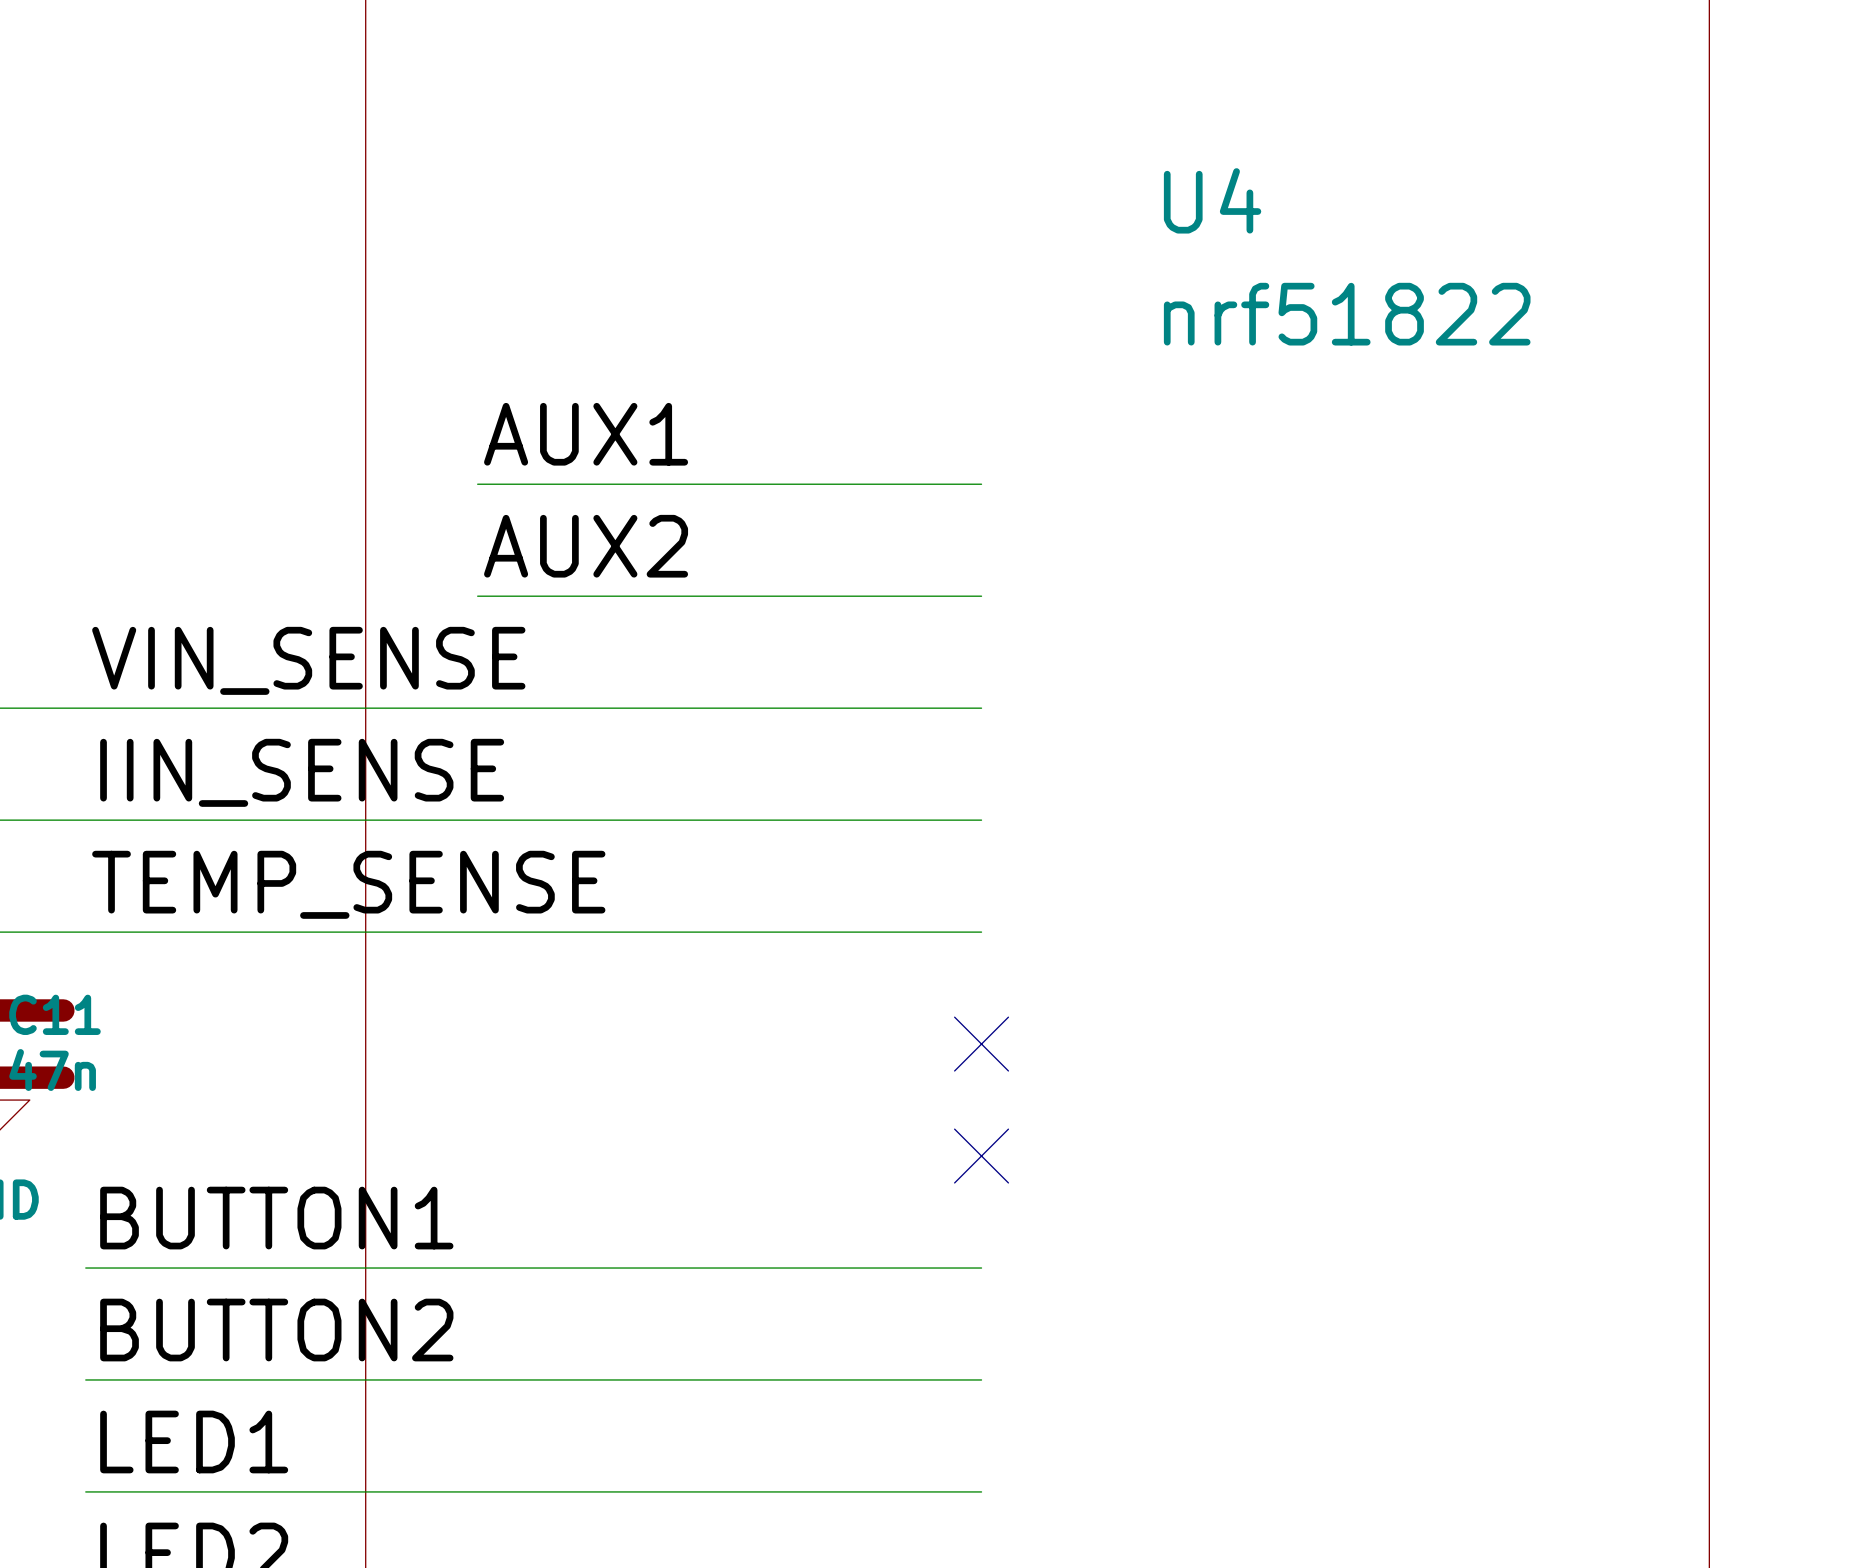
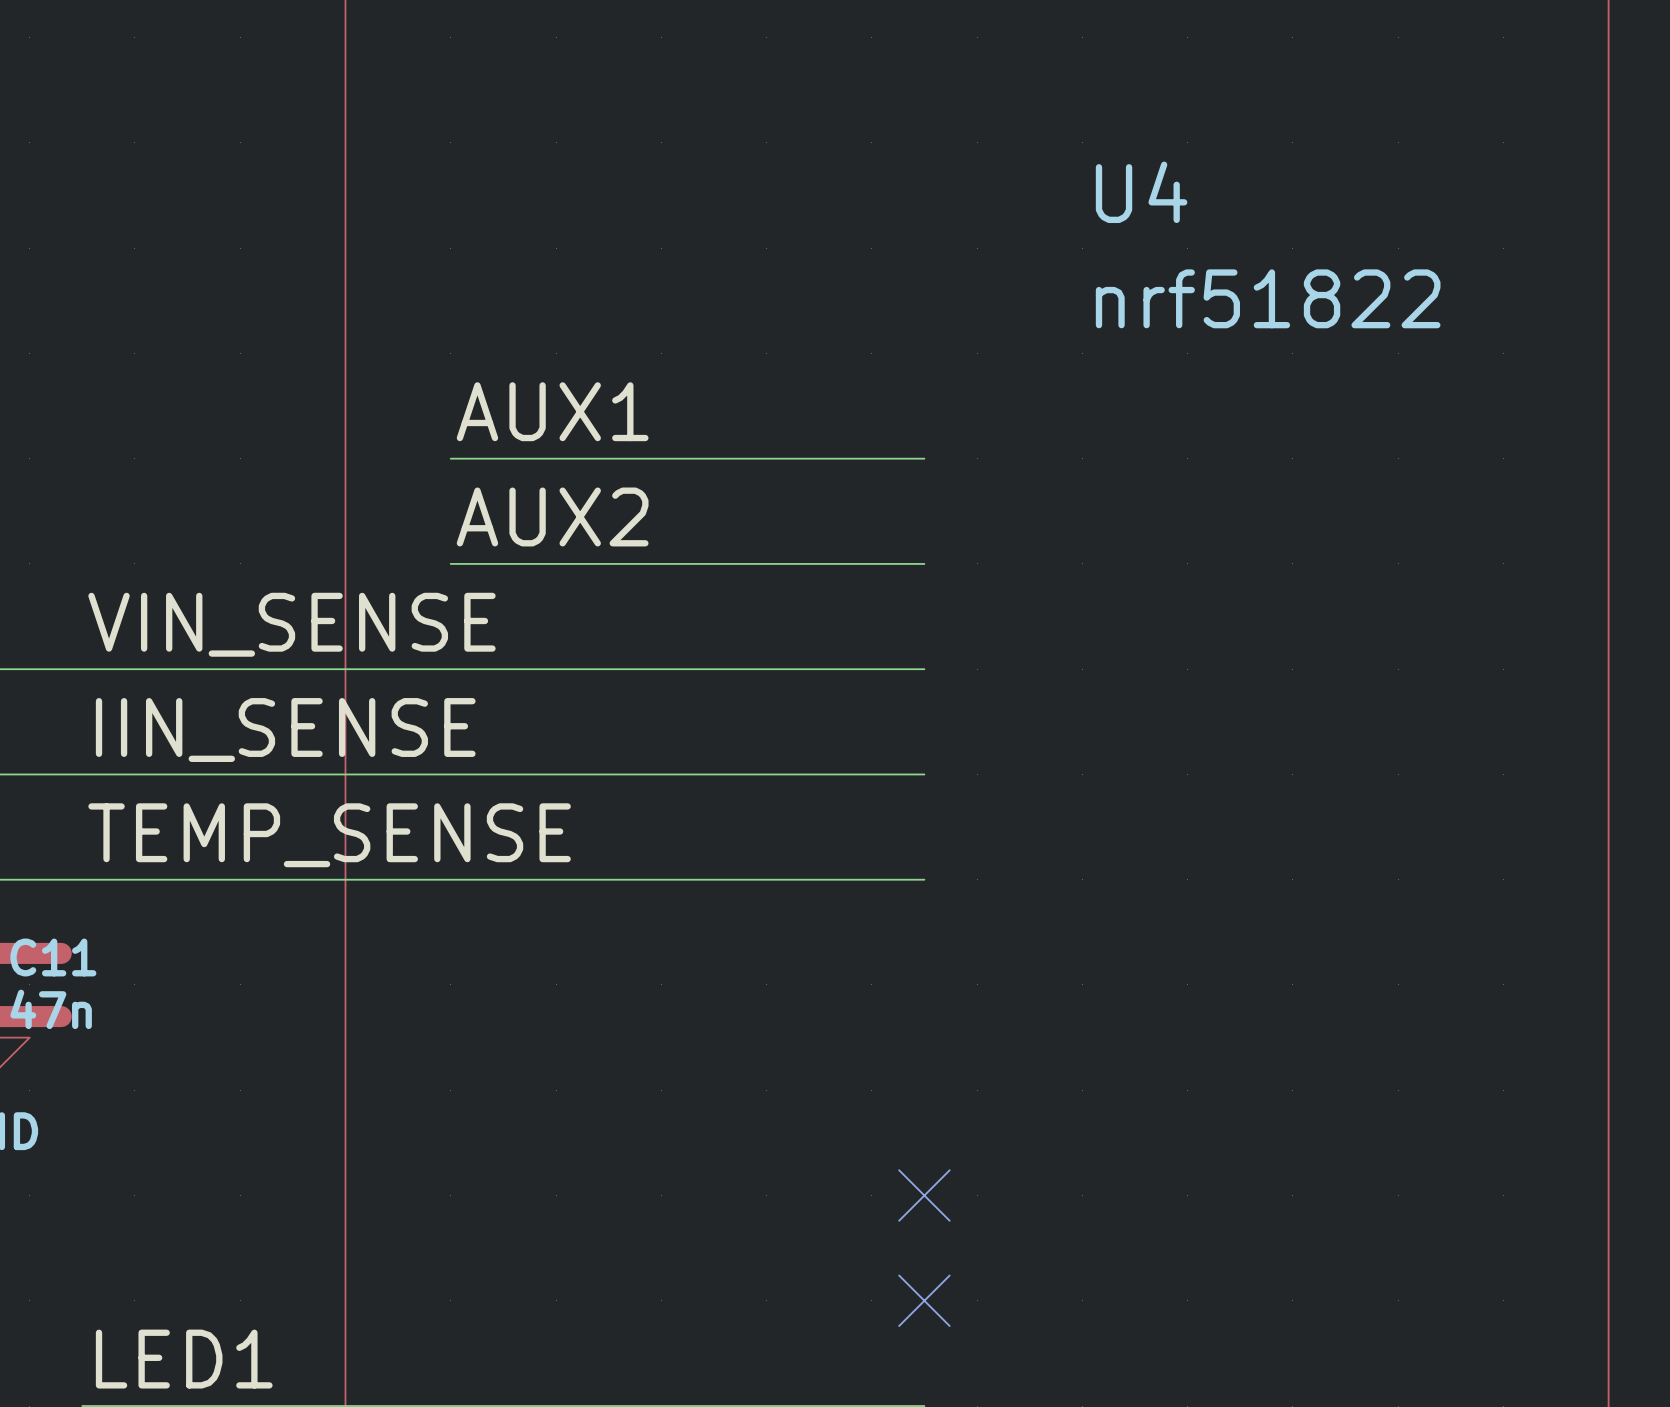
no-connect mark: (981, 1044) -> none
no-connect mark: (981, 1156) -> none
label: BUTTON1 (276, 1218) -> none
wire: (85, 1268) (981, 1268) -> none
no-connect mark: none -> (924, 1195)
label: BUTTON2 (276, 1330) -> none
wire: (85, 1379) (981, 1379) -> none
no-connect mark: none -> (924, 1300)

